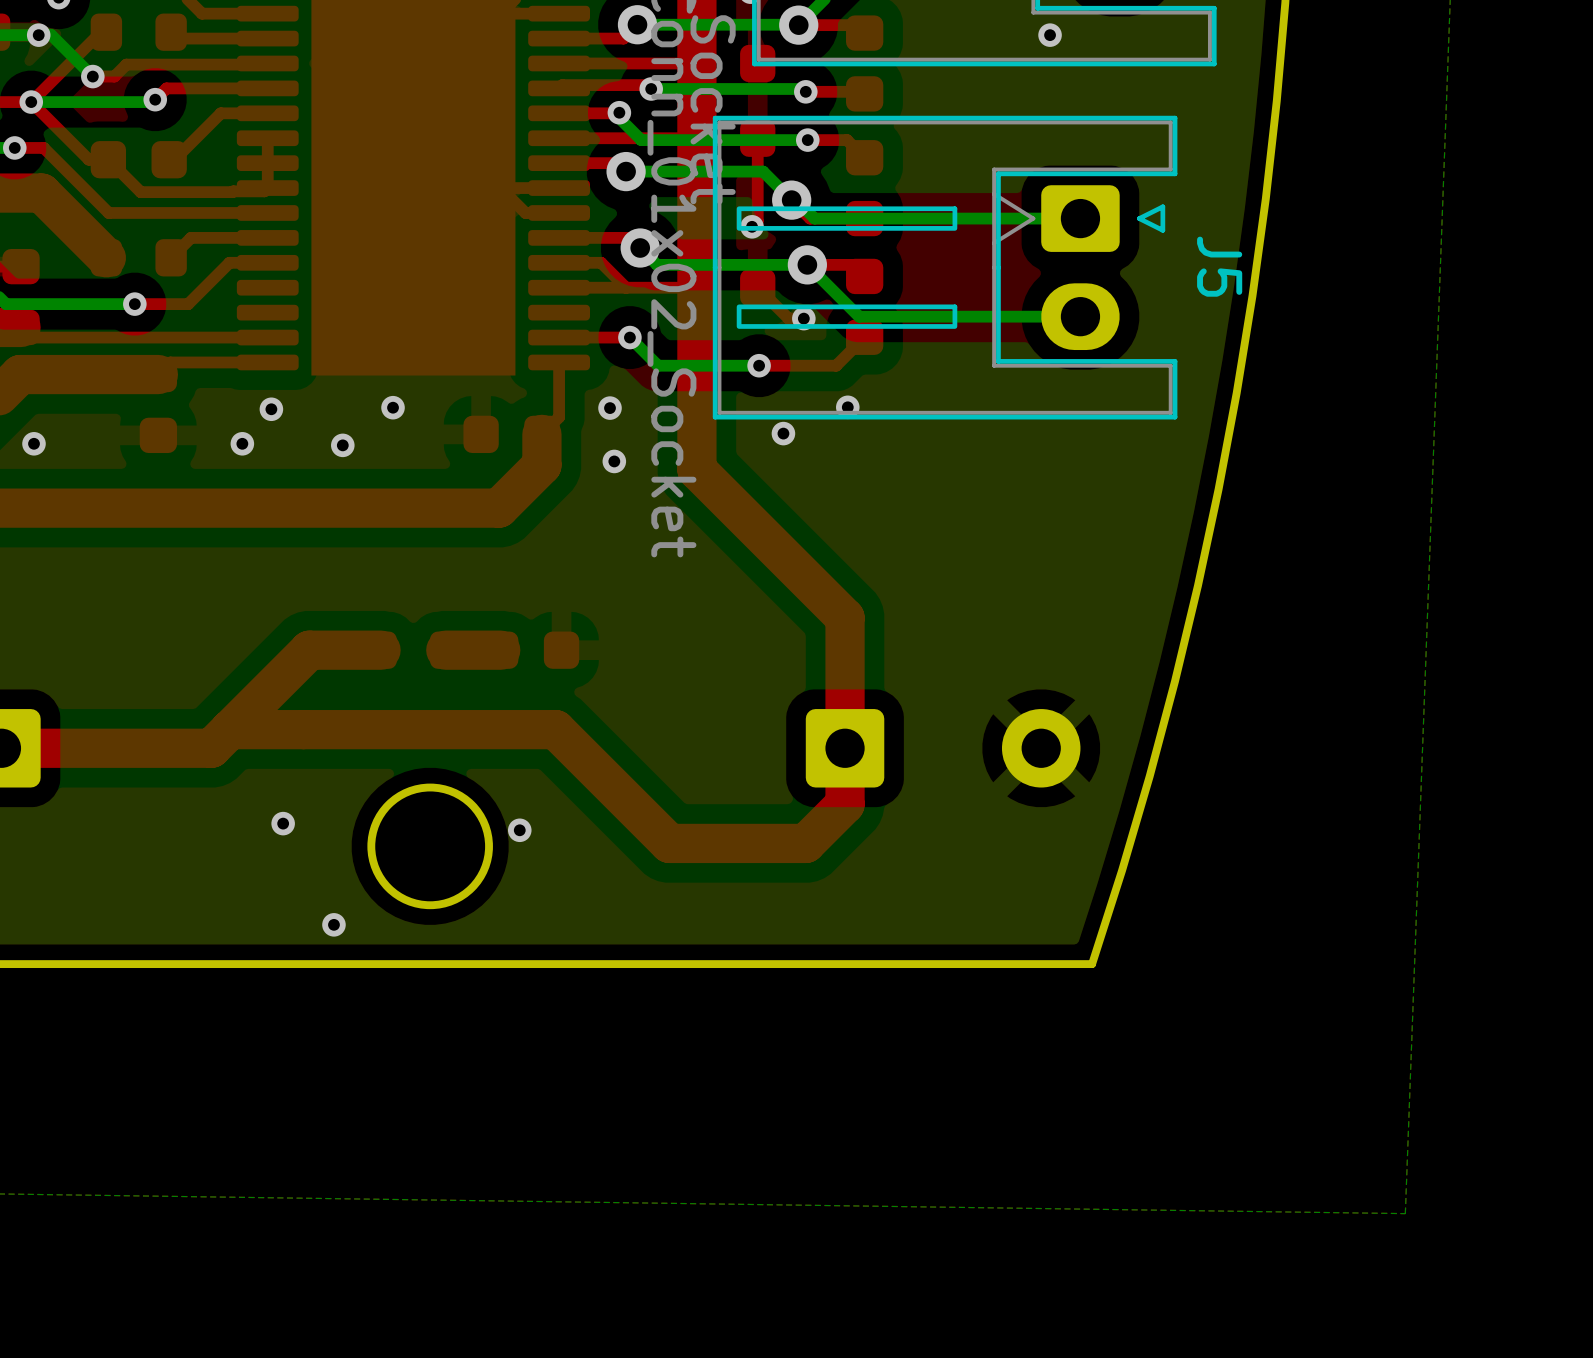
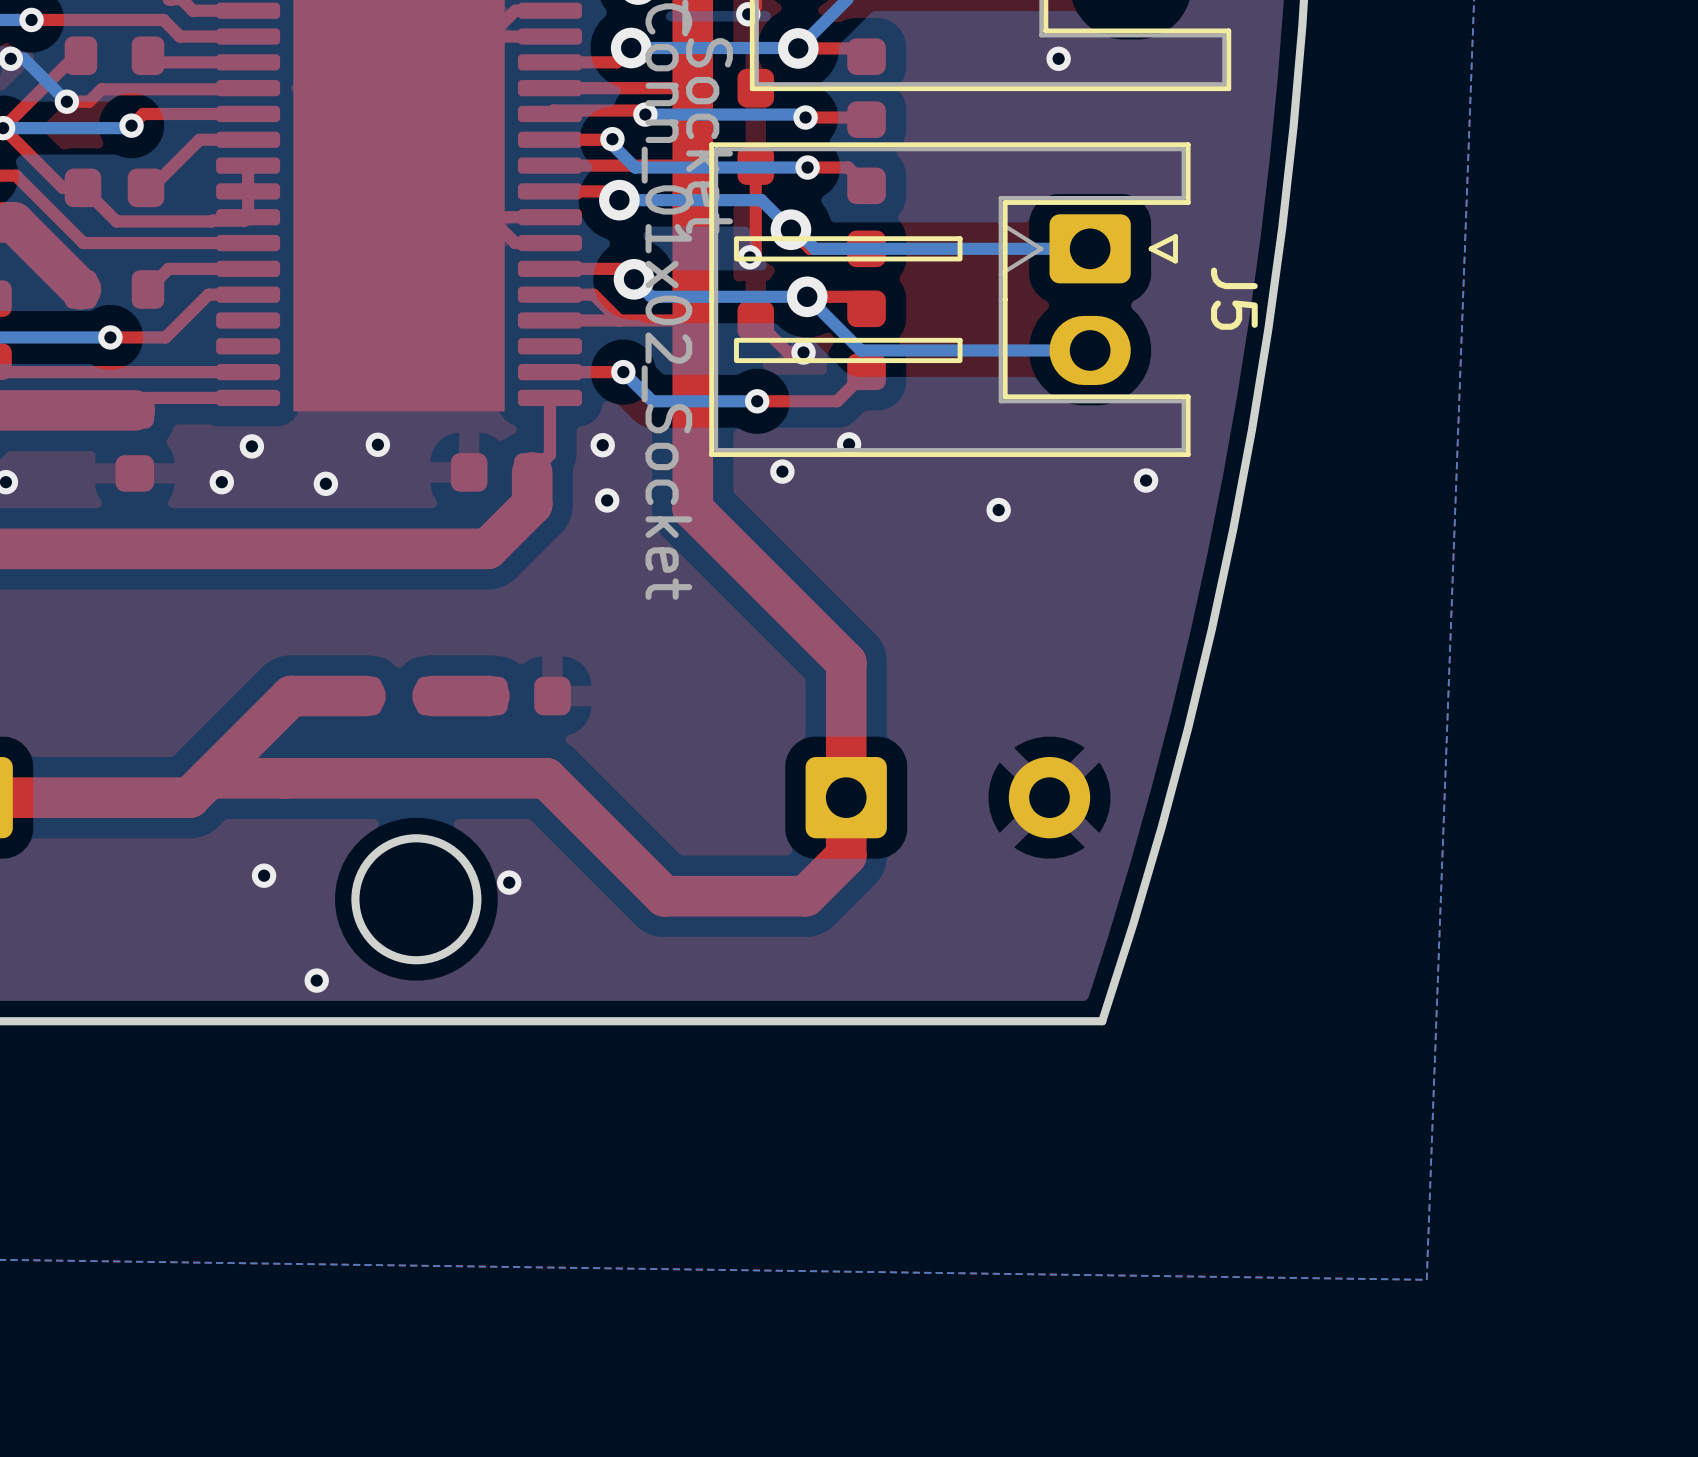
via: none -> (1146, 480)
via: none -> (998, 510)

